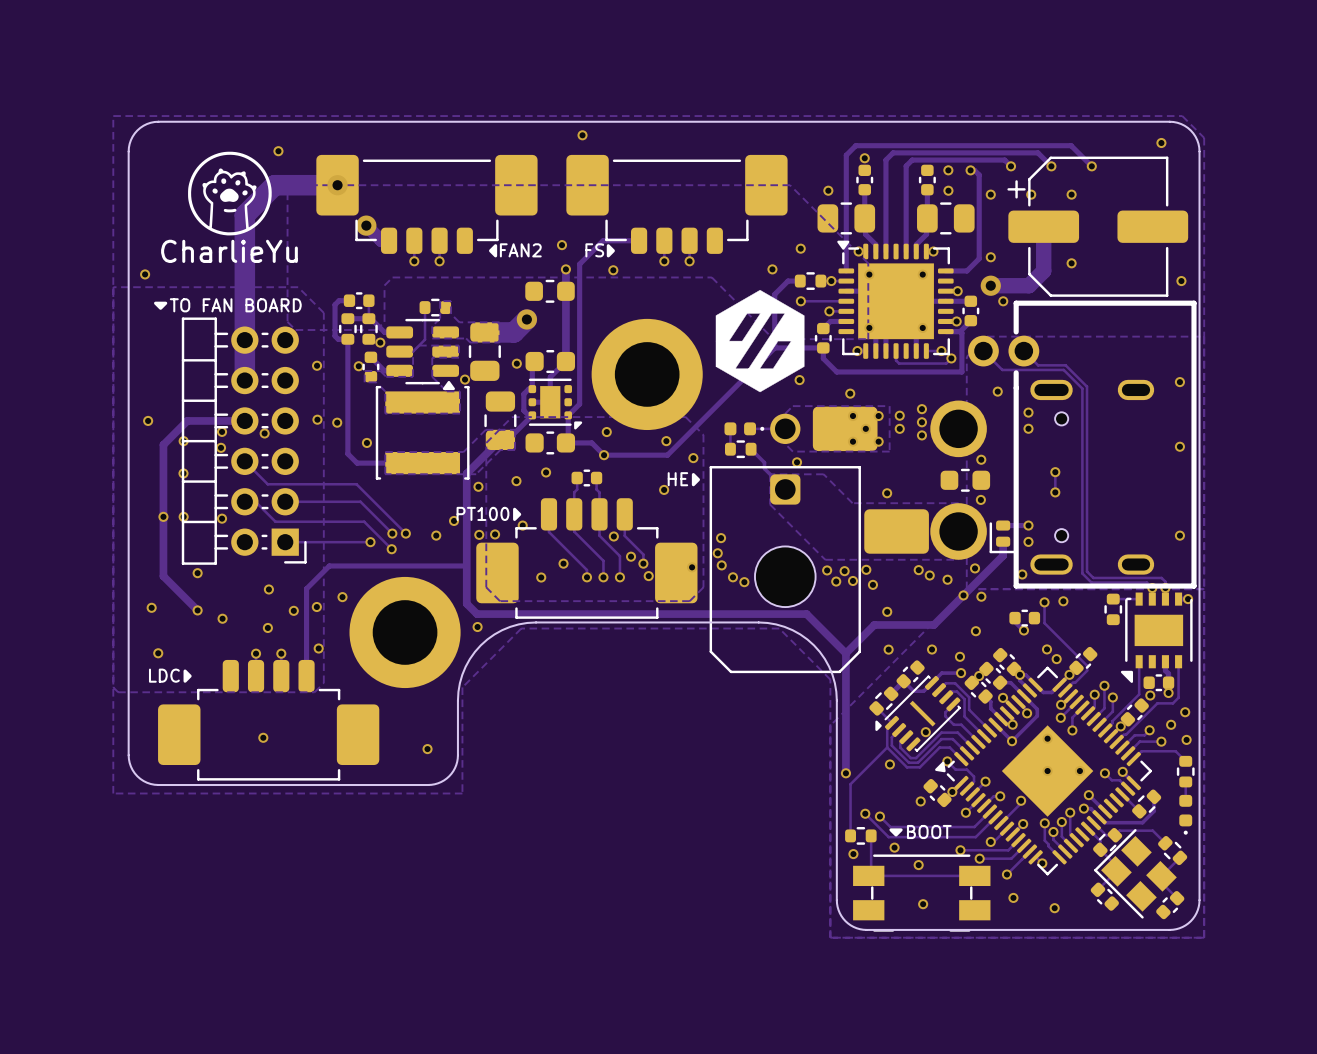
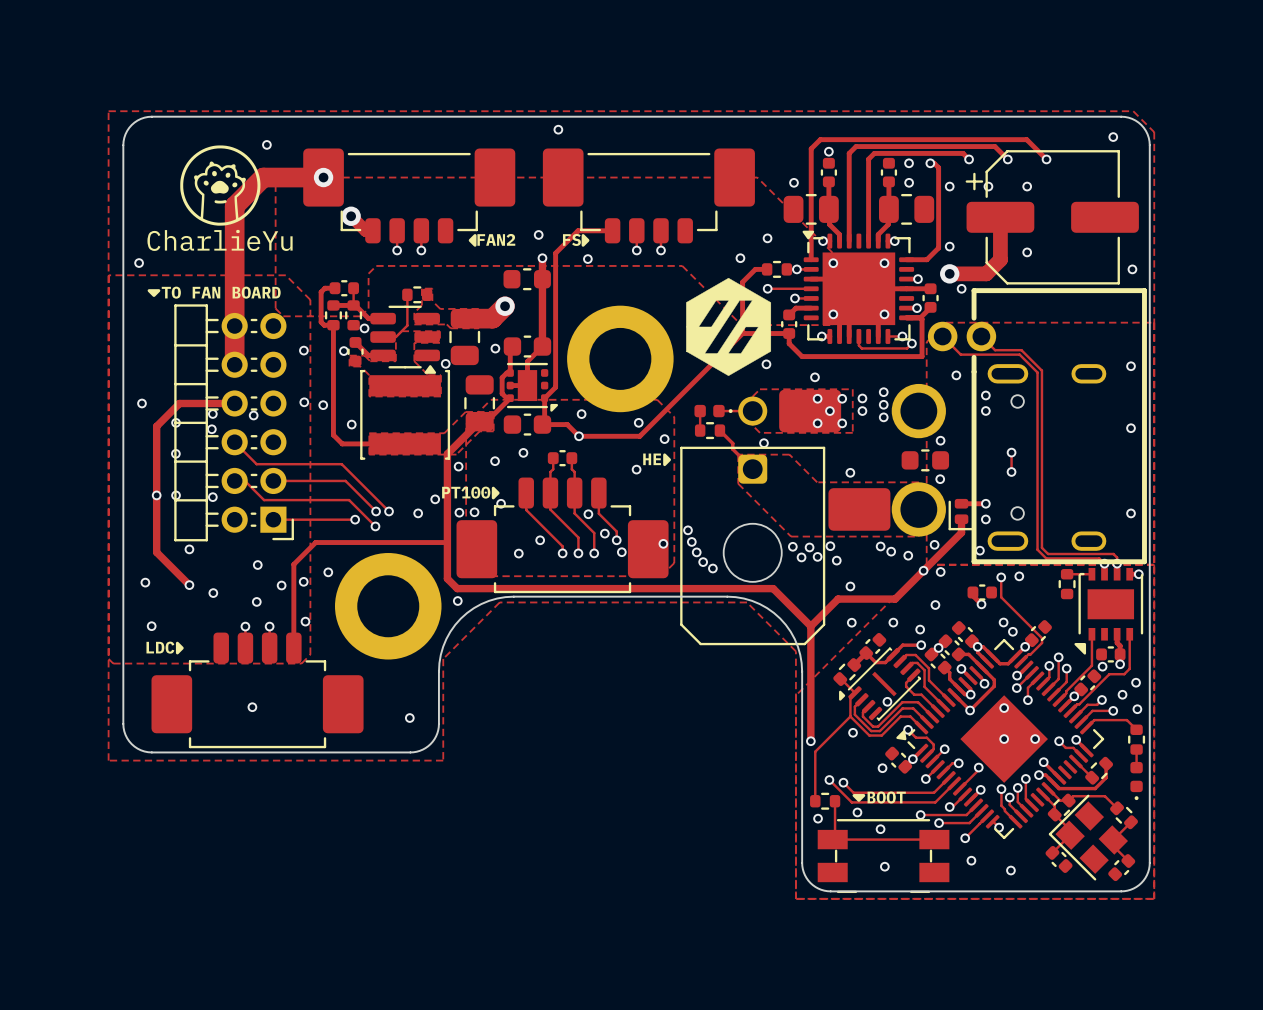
via: (721, 538) -> none
via: none -> (696, 552)
via: (732, 577) -> none
via: (744, 582) -> none
via: none -> (703, 562)
via: none -> (712, 568)

